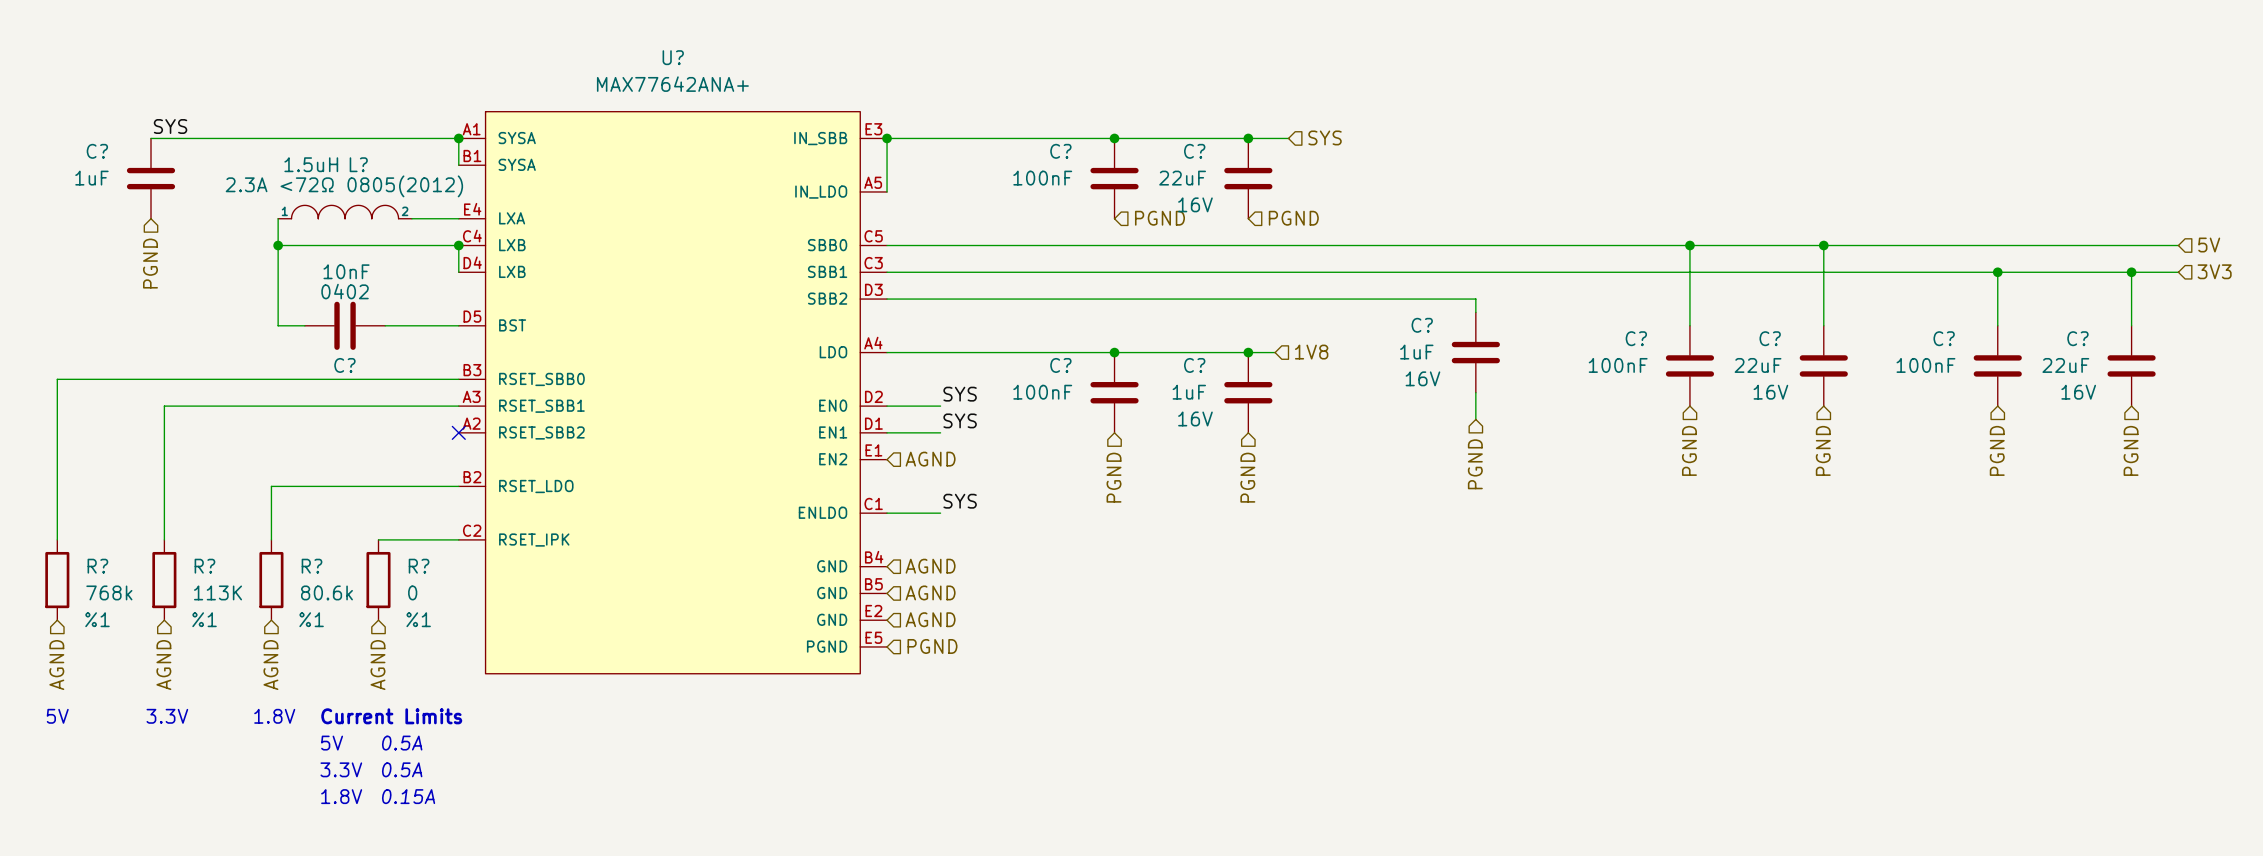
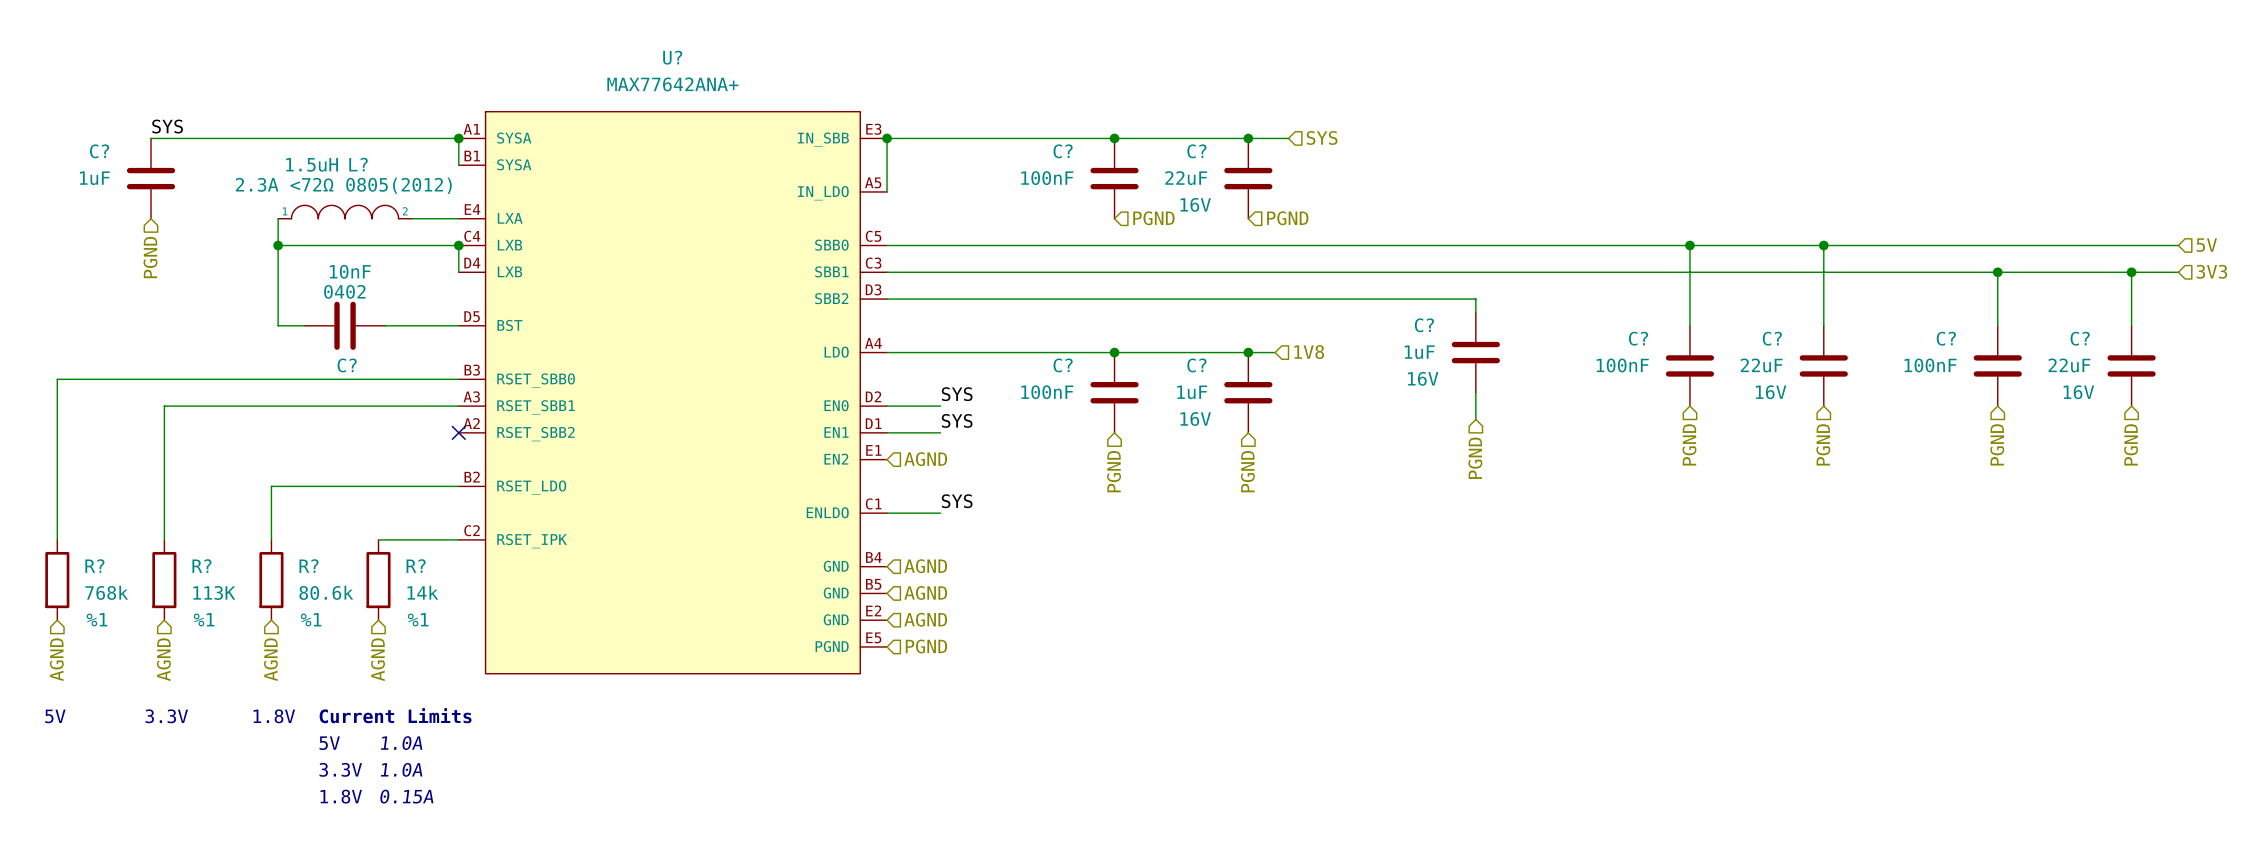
R? value: 0 (412, 592) -> 14k (422, 592)
text: 0.5A (402, 743) -> 1.0A (401, 743)
text: 0.5A (402, 769) -> 1.0A (401, 769)

